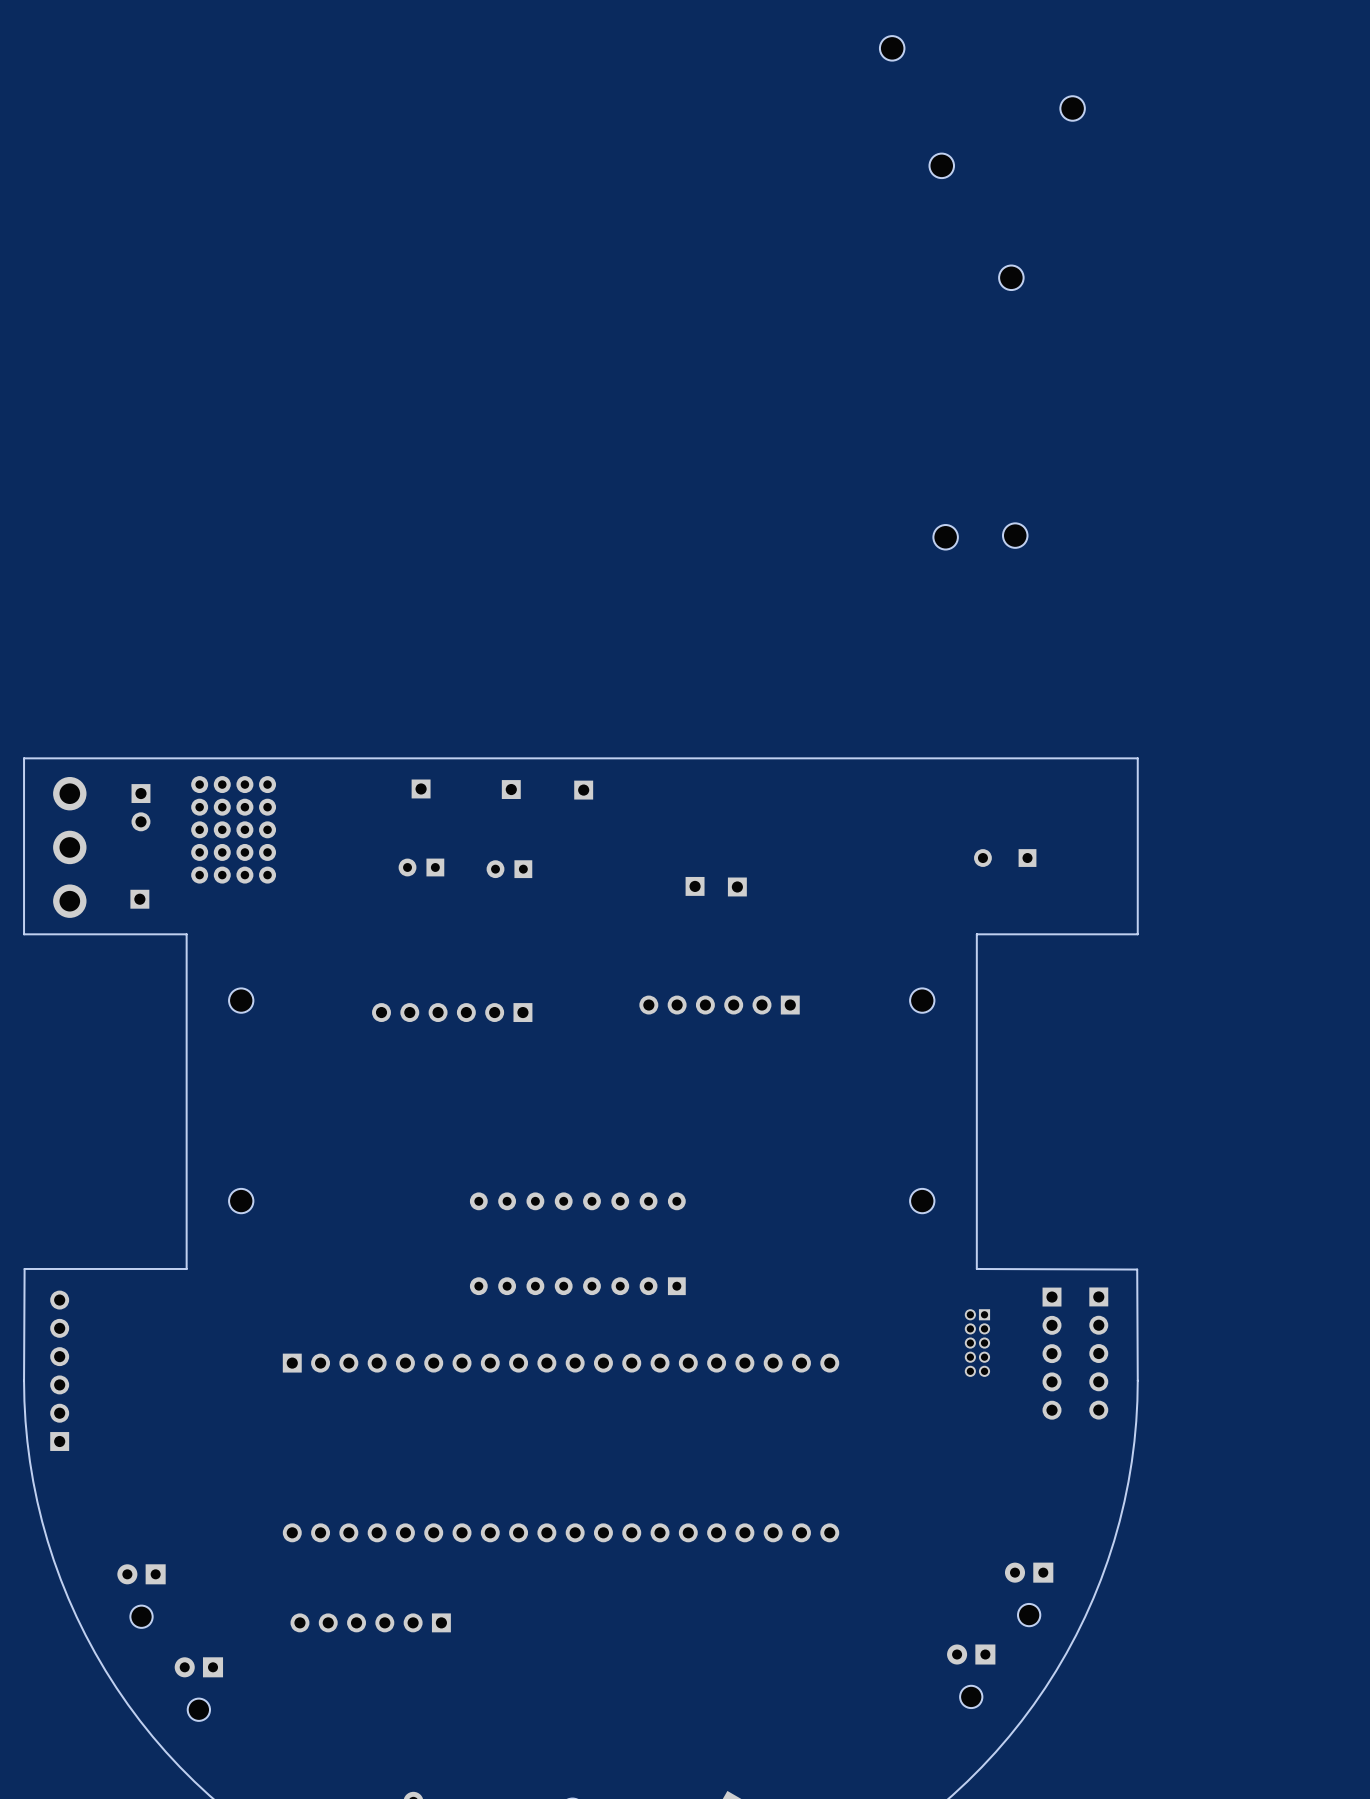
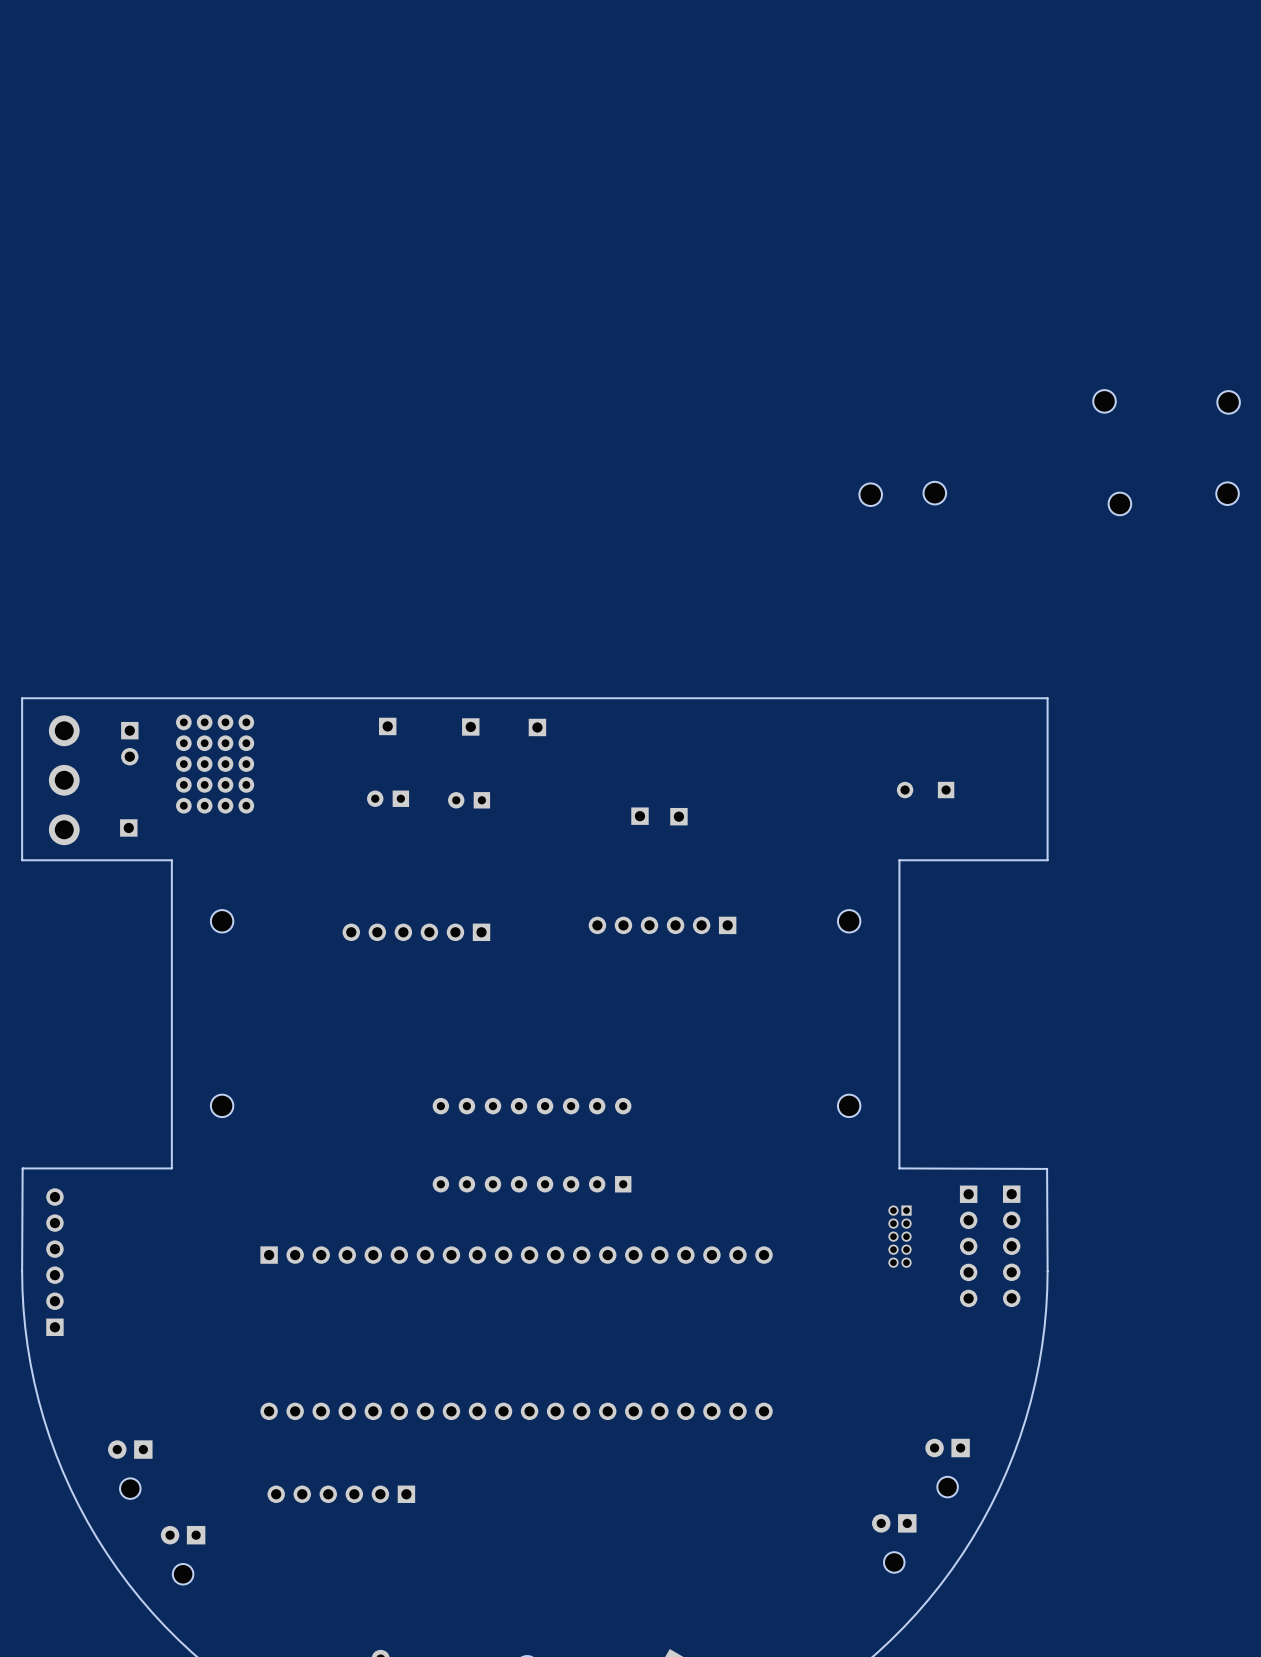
part: (892, 48) -> none
part: (1072, 108) -> none
part: (941, 165) -> none
part: (1011, 277) -> none
part: none -> (1104, 401)
part: none -> (1228, 402)
part: none -> (1227, 493)
part: none -> (1119, 503)

